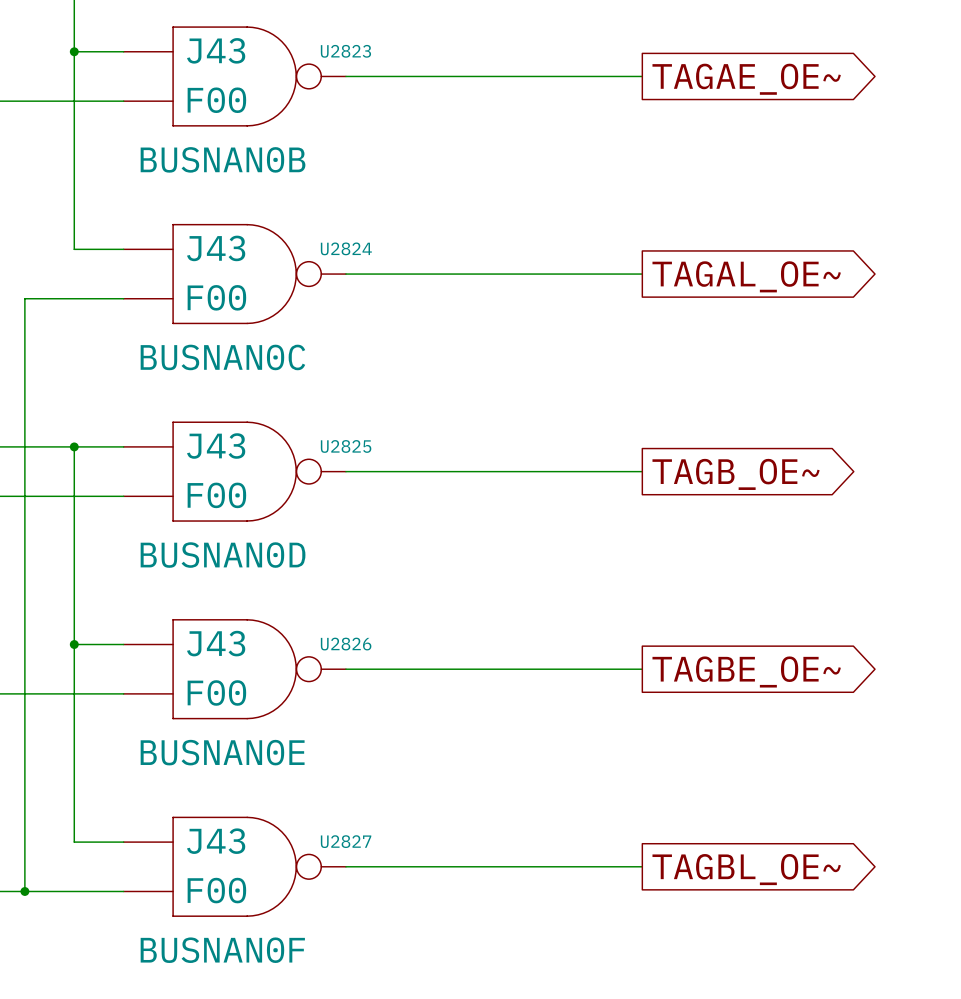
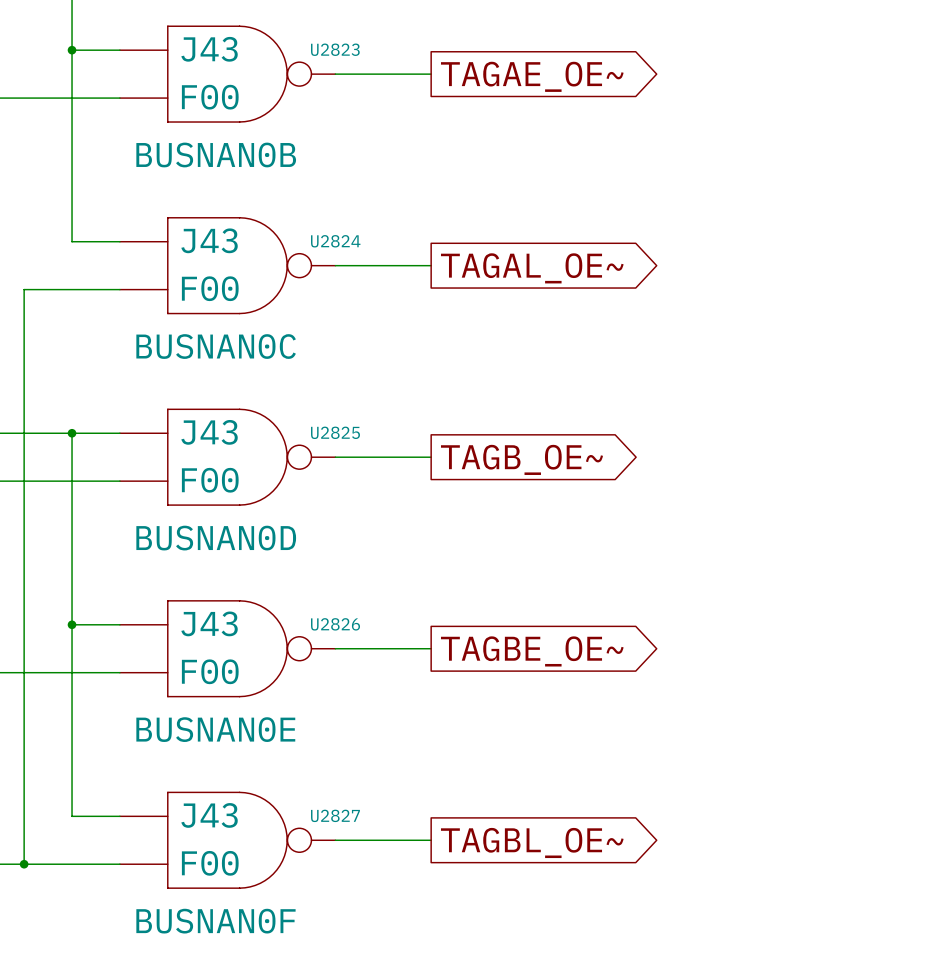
wire: (444, 76) (642, 76) -> none
global label position: TAGAE_OE~ (746, 79) -> TAGAE_OE~ (532, 76)
wire: (444, 274) (642, 274) -> none
global label position: TAGAL_OE~ (746, 276) -> TAGAL_OE~ (532, 268)
wire: (444, 471) (642, 471) -> none
global label position: TAGB_OE~ (736, 474) -> TAGB_OE~ (521, 459)
wire: (444, 669) (642, 669) -> none
global label position: TAGBE_OE~ (746, 671) -> TAGBE_OE~ (532, 651)
wire: (444, 866) (642, 866) -> none
global label position: TAGBL_OE~ (746, 869) -> TAGBL_OE~ (532, 842)

